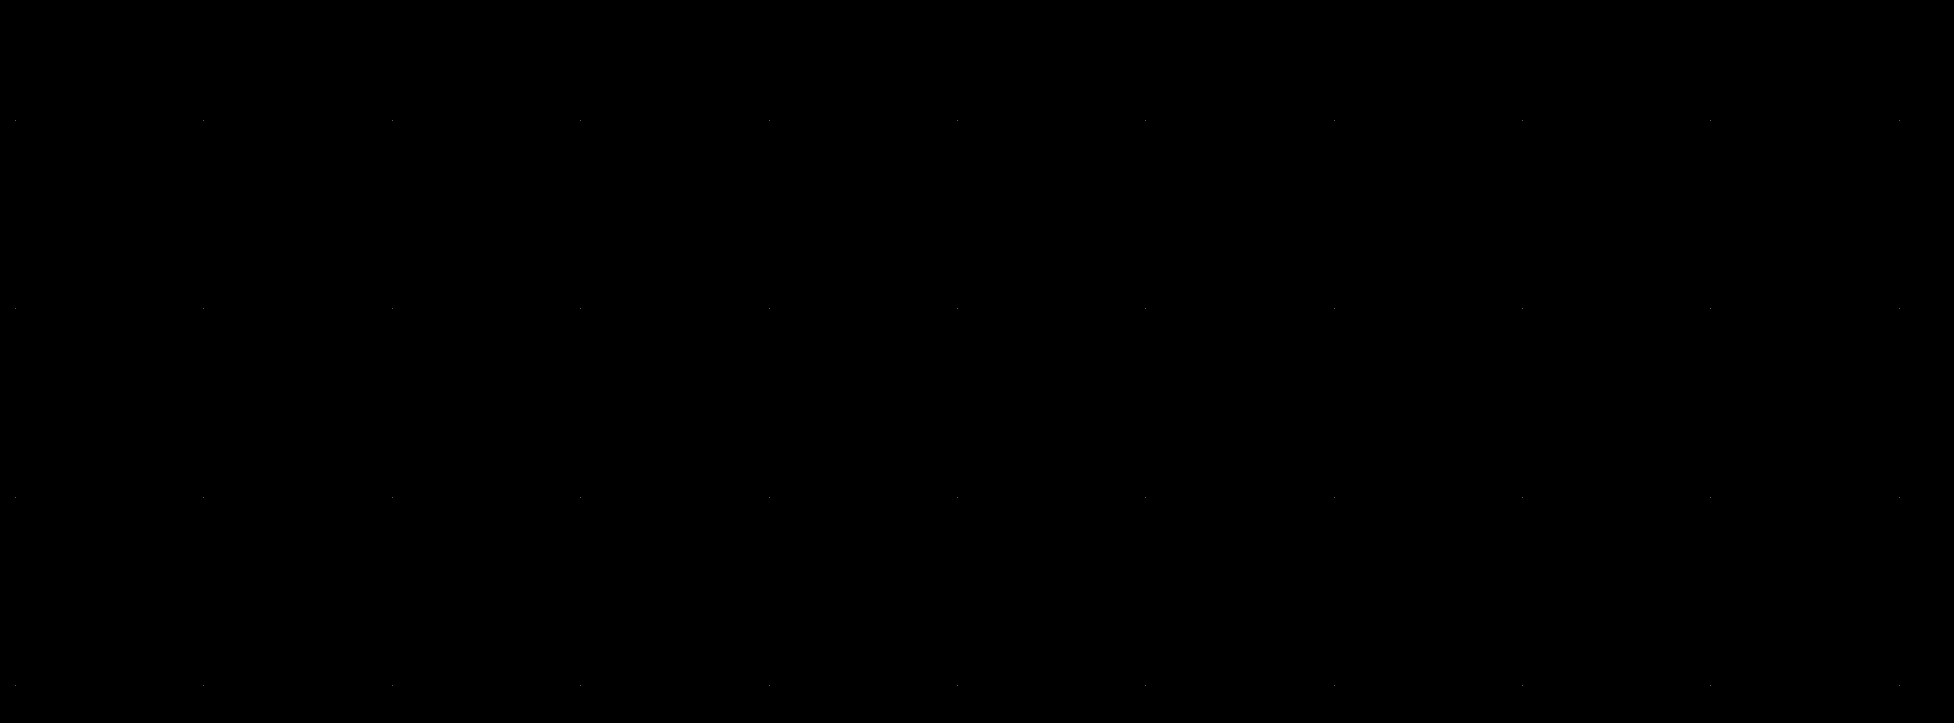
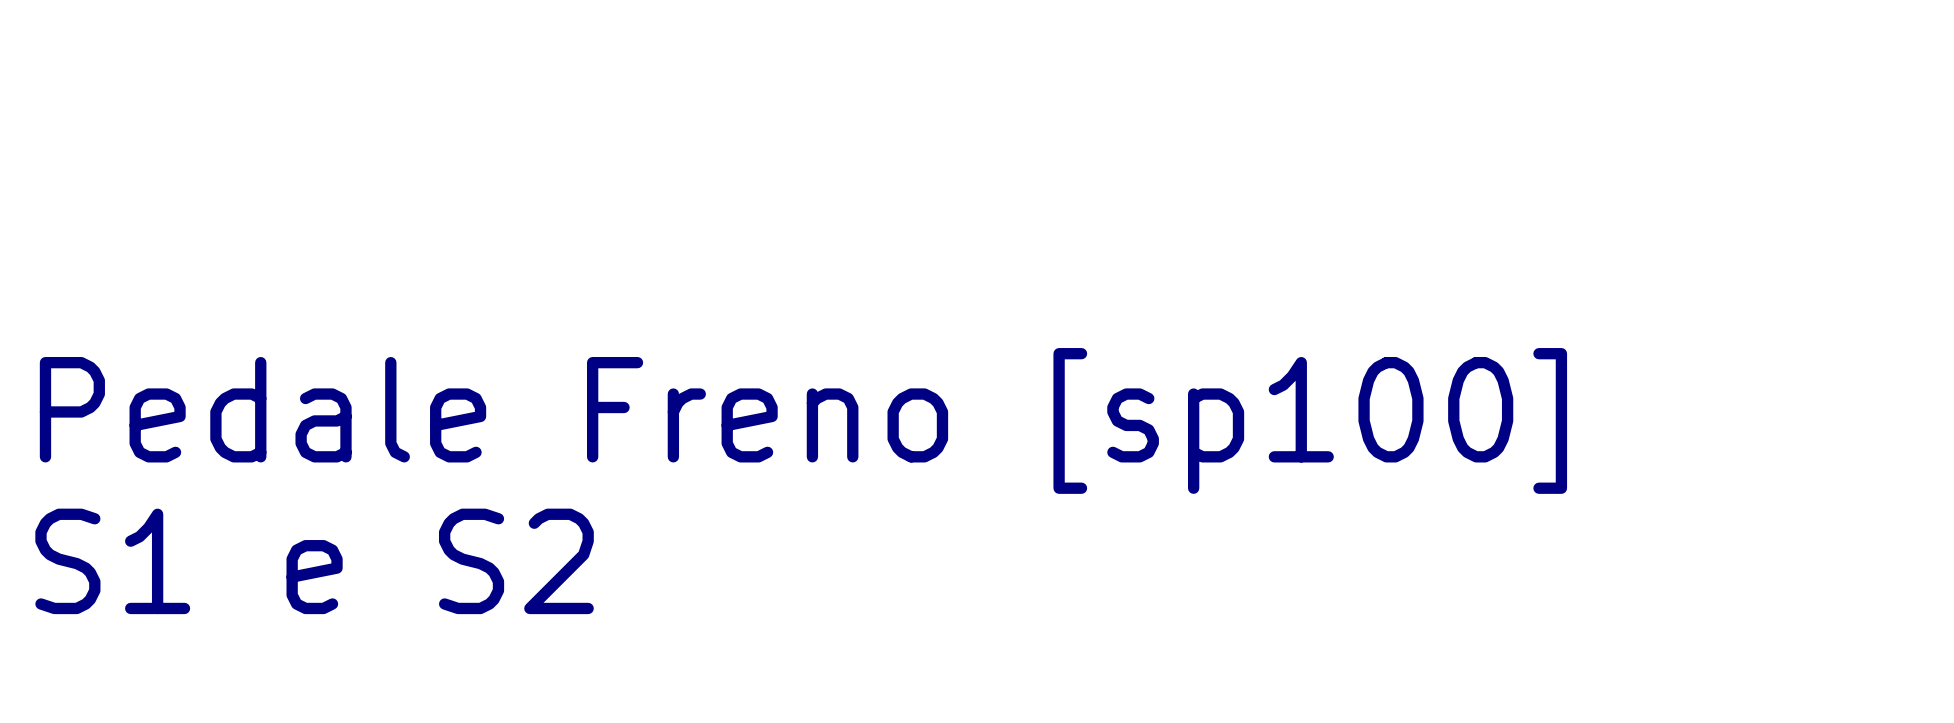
text: none -> Pedale Freno [sp100] (803, 420)
text: none -> S1 e S2 (314, 561)

